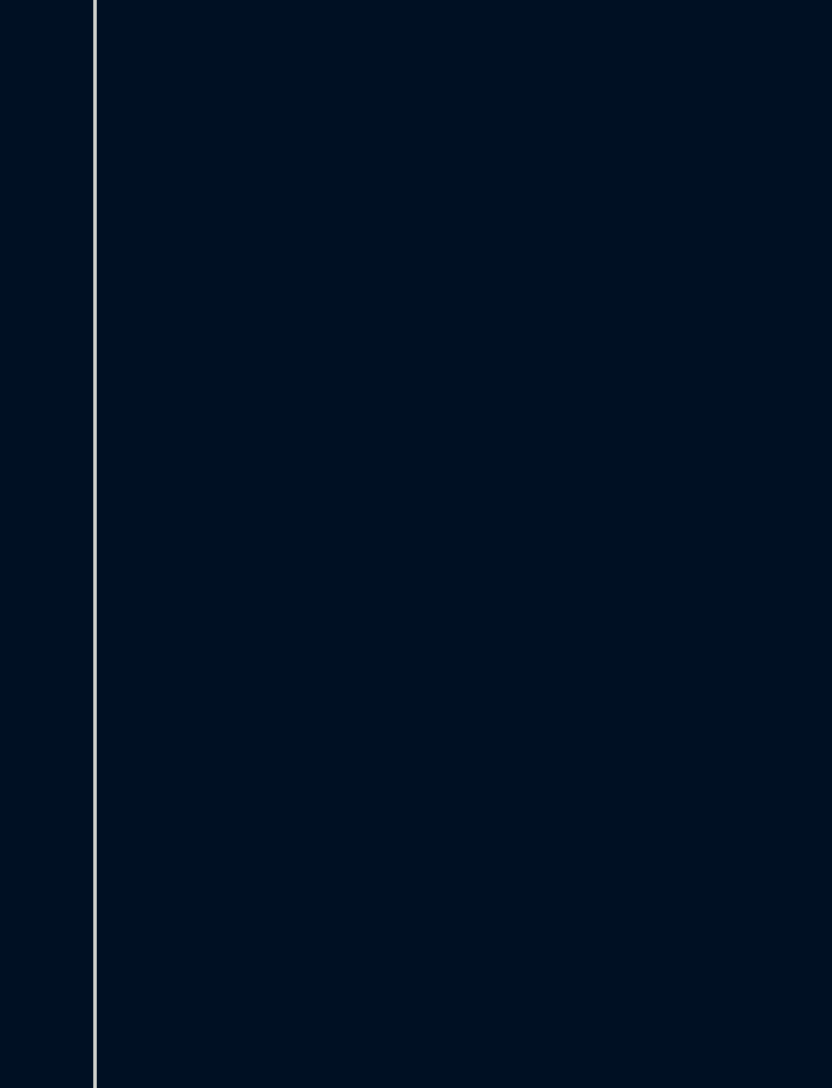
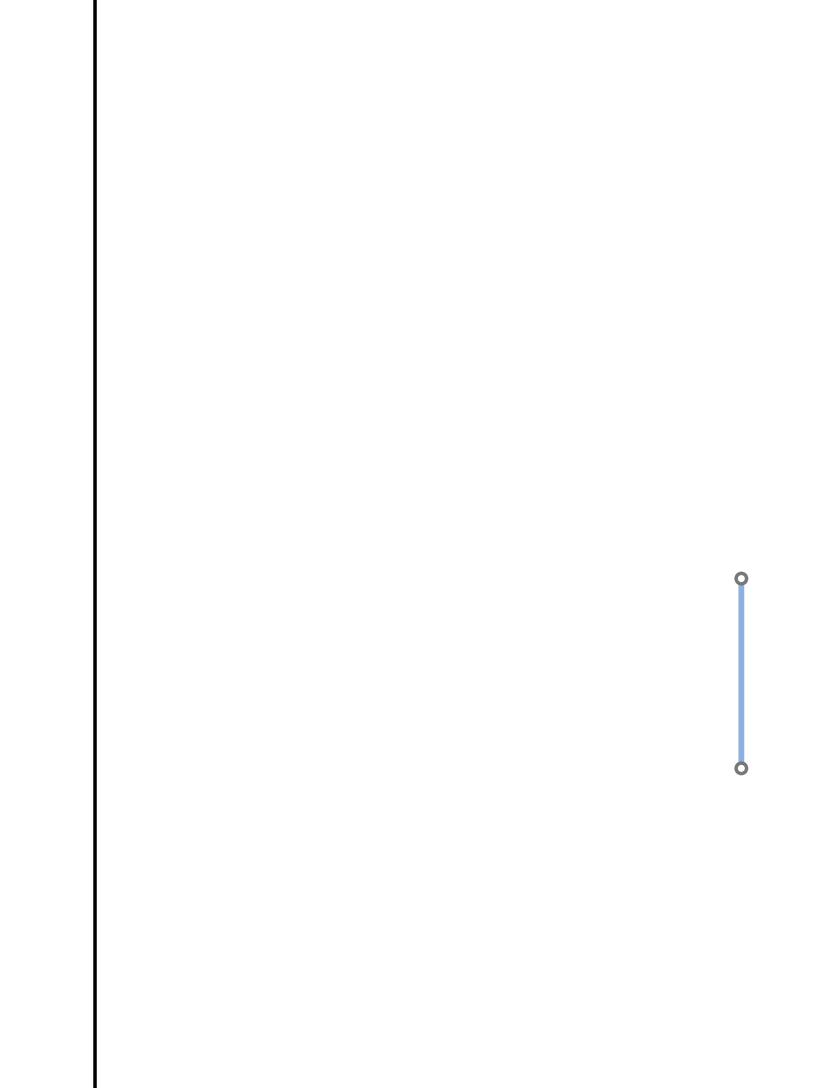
track: none -> (741, 578) (741, 768)
via: none -> (741, 578)
via: none -> (741, 768)

